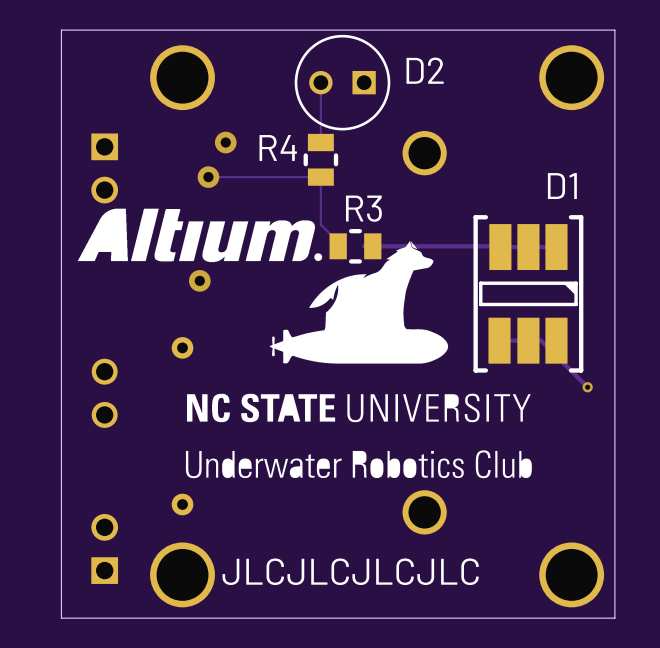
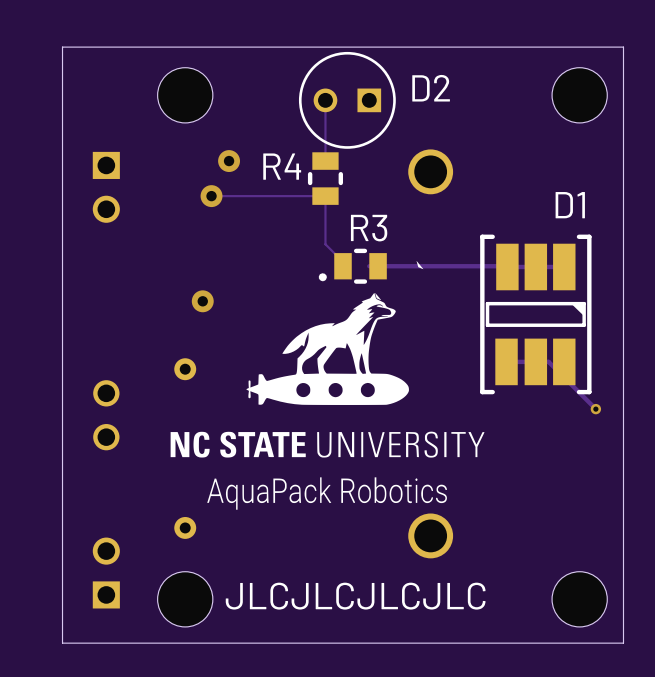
part footprint: [150, 45, 215, 111] -> [157, 67, 213, 123]
part footprint: [539, 45, 605, 111] -> [552, 67, 608, 123]
drawing: [77, 208, 449, 364] -> none
drawing: none -> [170, 292, 485, 510]
drawing: [187, 393, 531, 423] -> none
drawing: [185, 450, 532, 479] -> none
part footprint: [150, 542, 215, 608] -> [157, 571, 213, 627]
part footprint: [539, 542, 605, 608] -> [552, 571, 608, 627]

